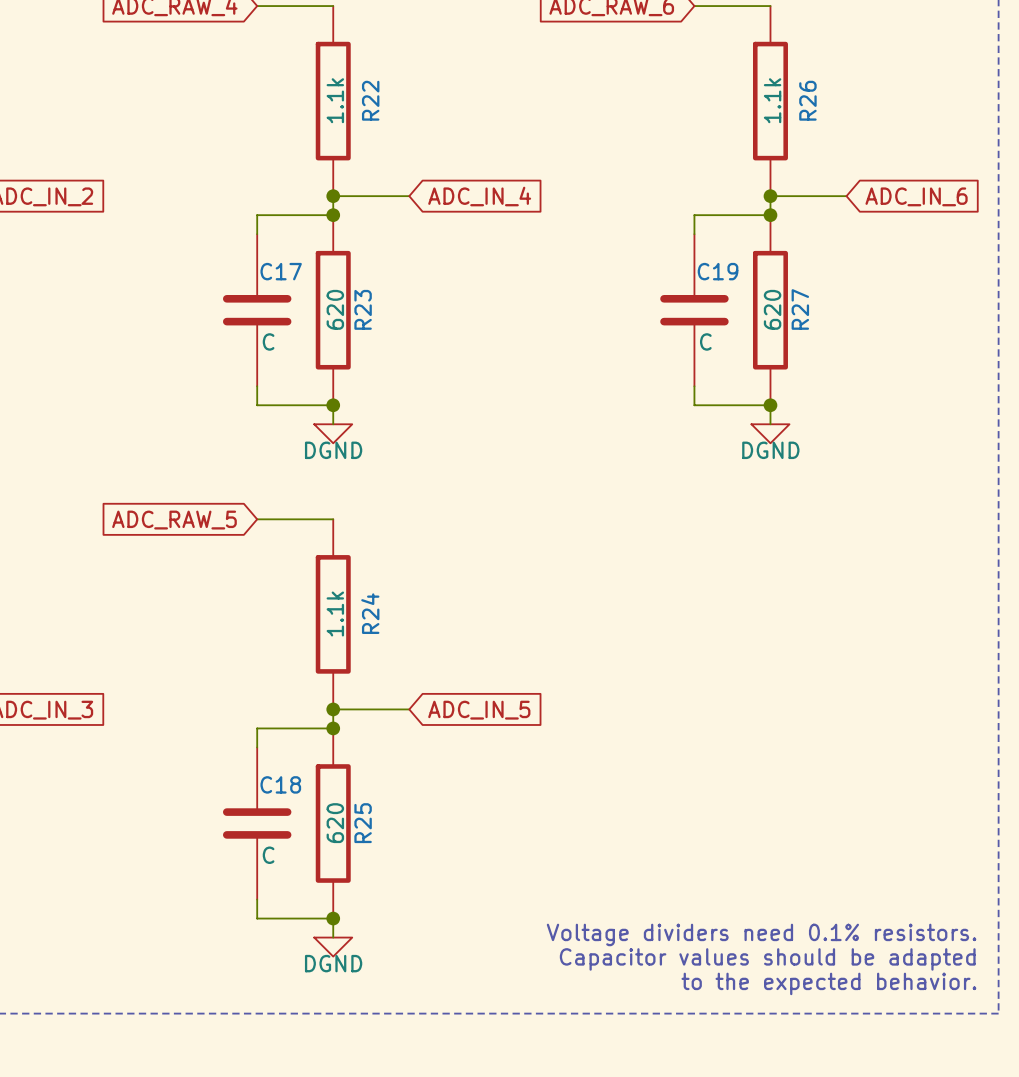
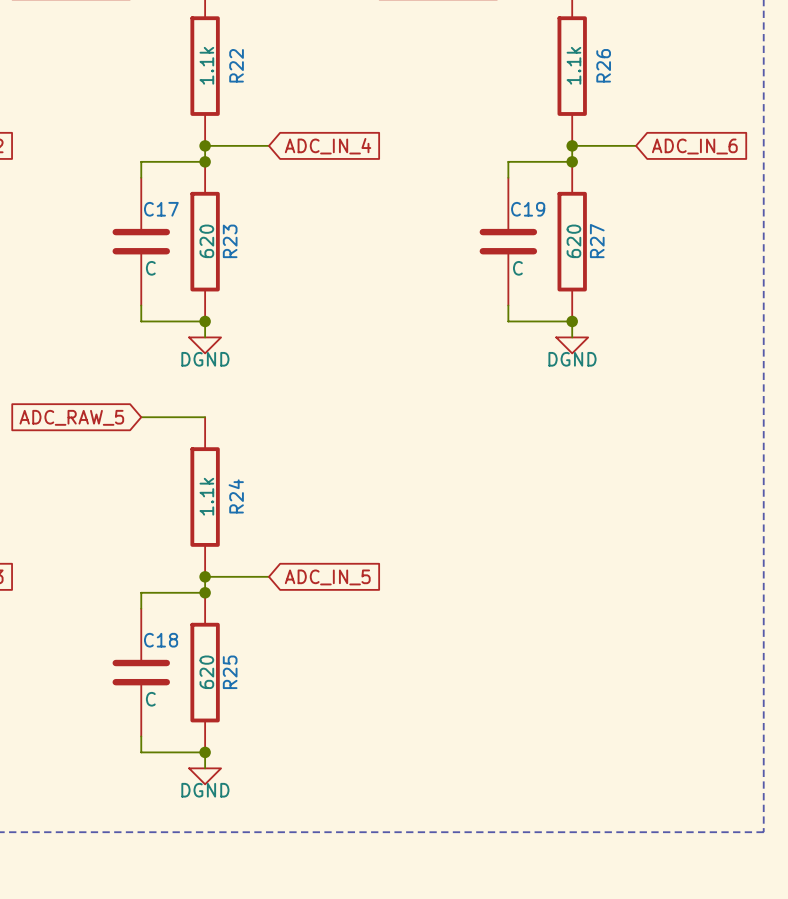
text: Voltage dividers need 0.1% resistors. (761, 934) -> none
text: Capacitor values should be adapted (767, 959) -> none
text: to the expected behavior. (828, 983) -> none

